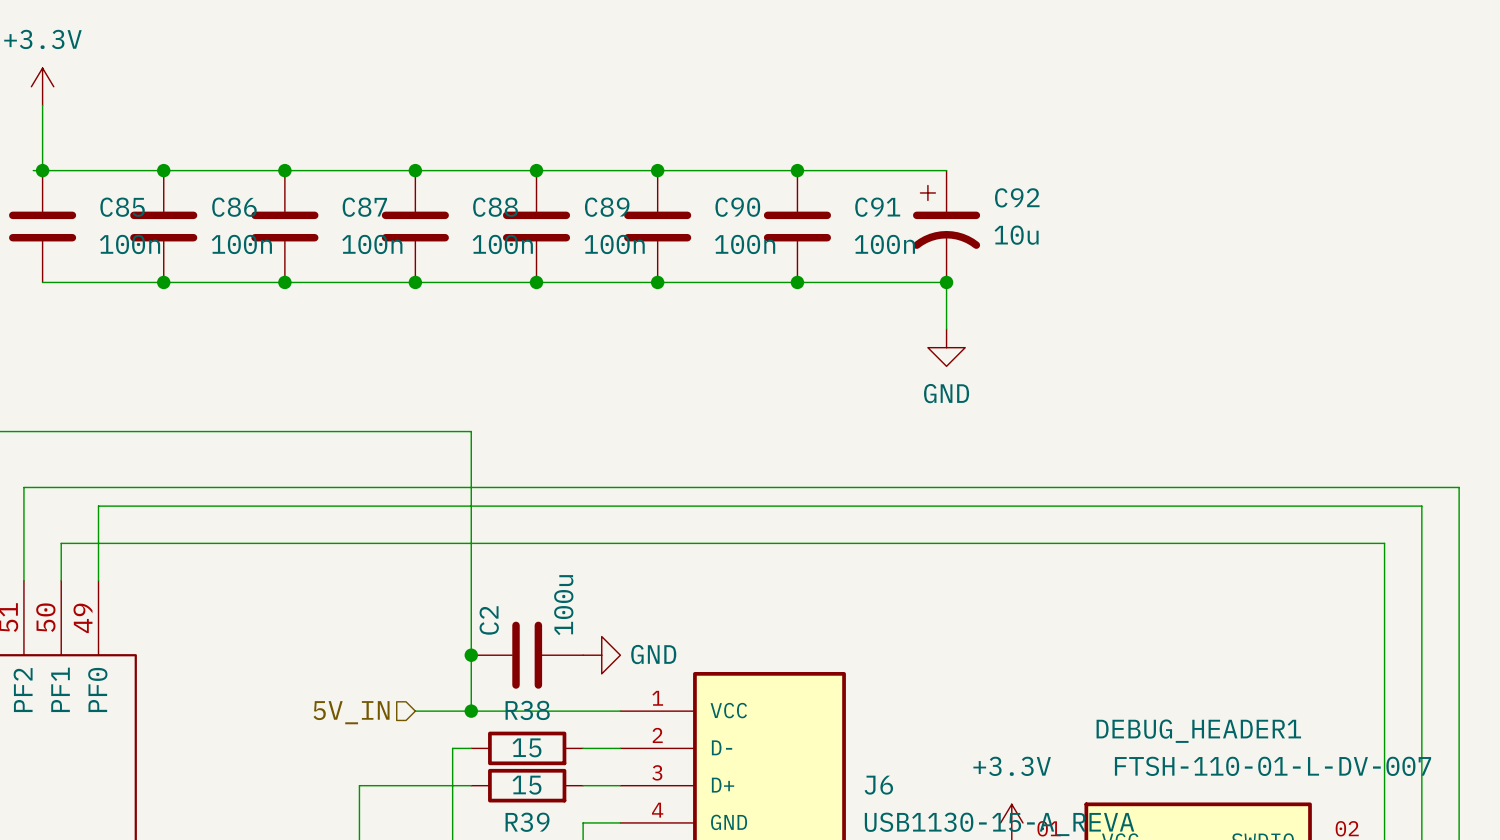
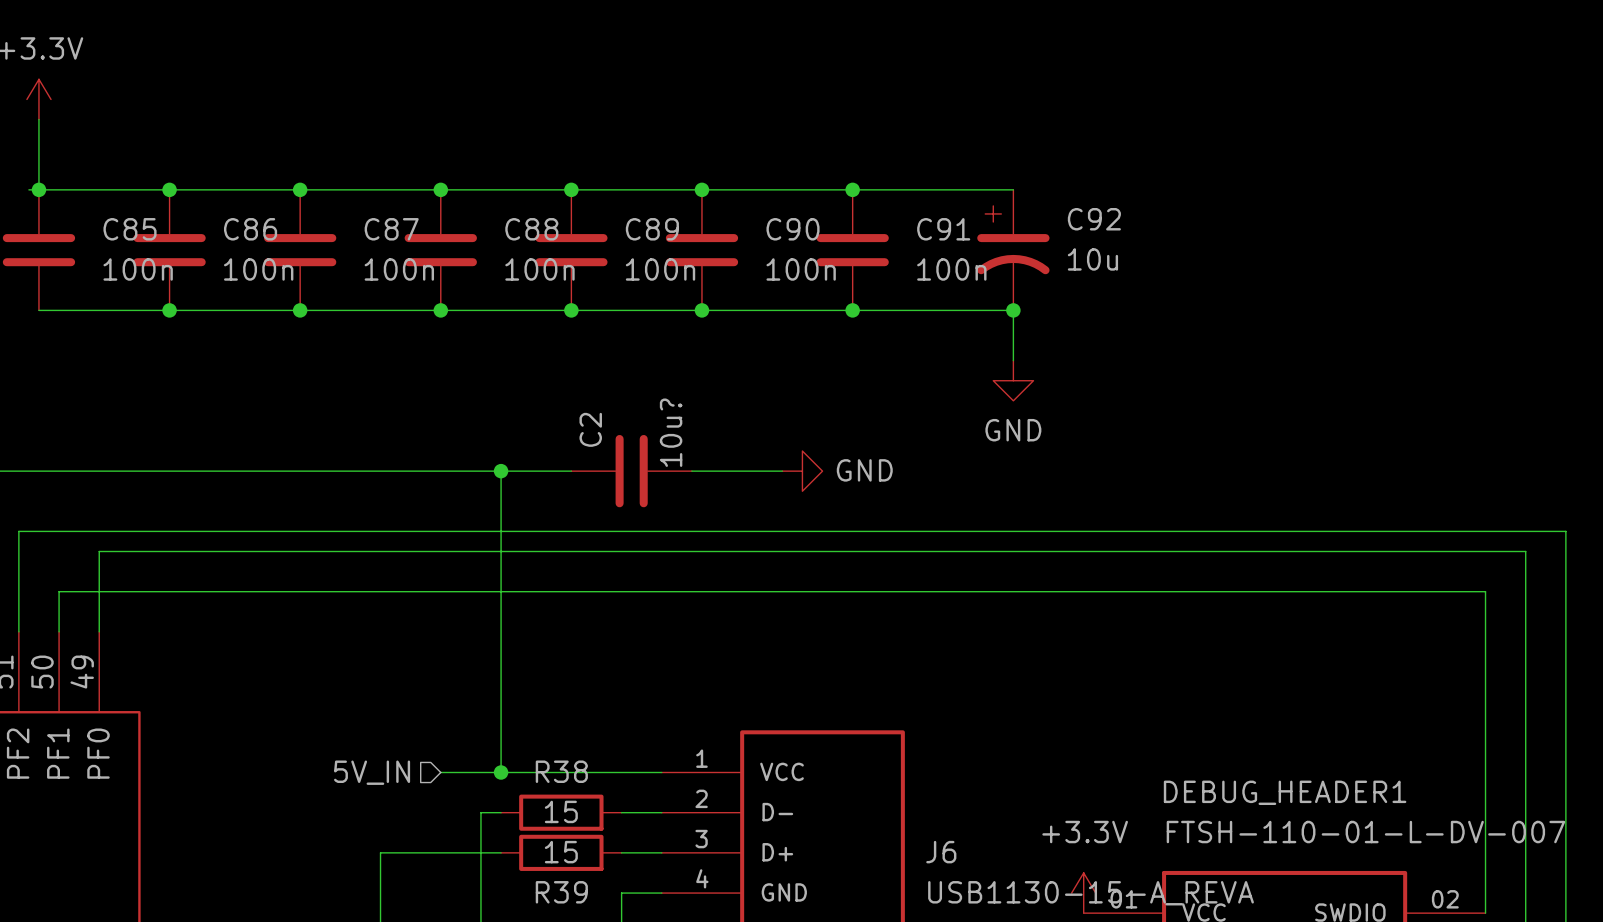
wire: none -> (501, 471) (571, 471)
junction: none -> (501, 471)
wire: none -> (691, 471) (782, 471)
C2 value: 100u (563, 605) -> 10u? (671, 432)
junction: (471, 655) -> none
C2 position: (527, 655) -> (631, 471)
power symbol position: GND (601, 655) -> GND (802, 471)

